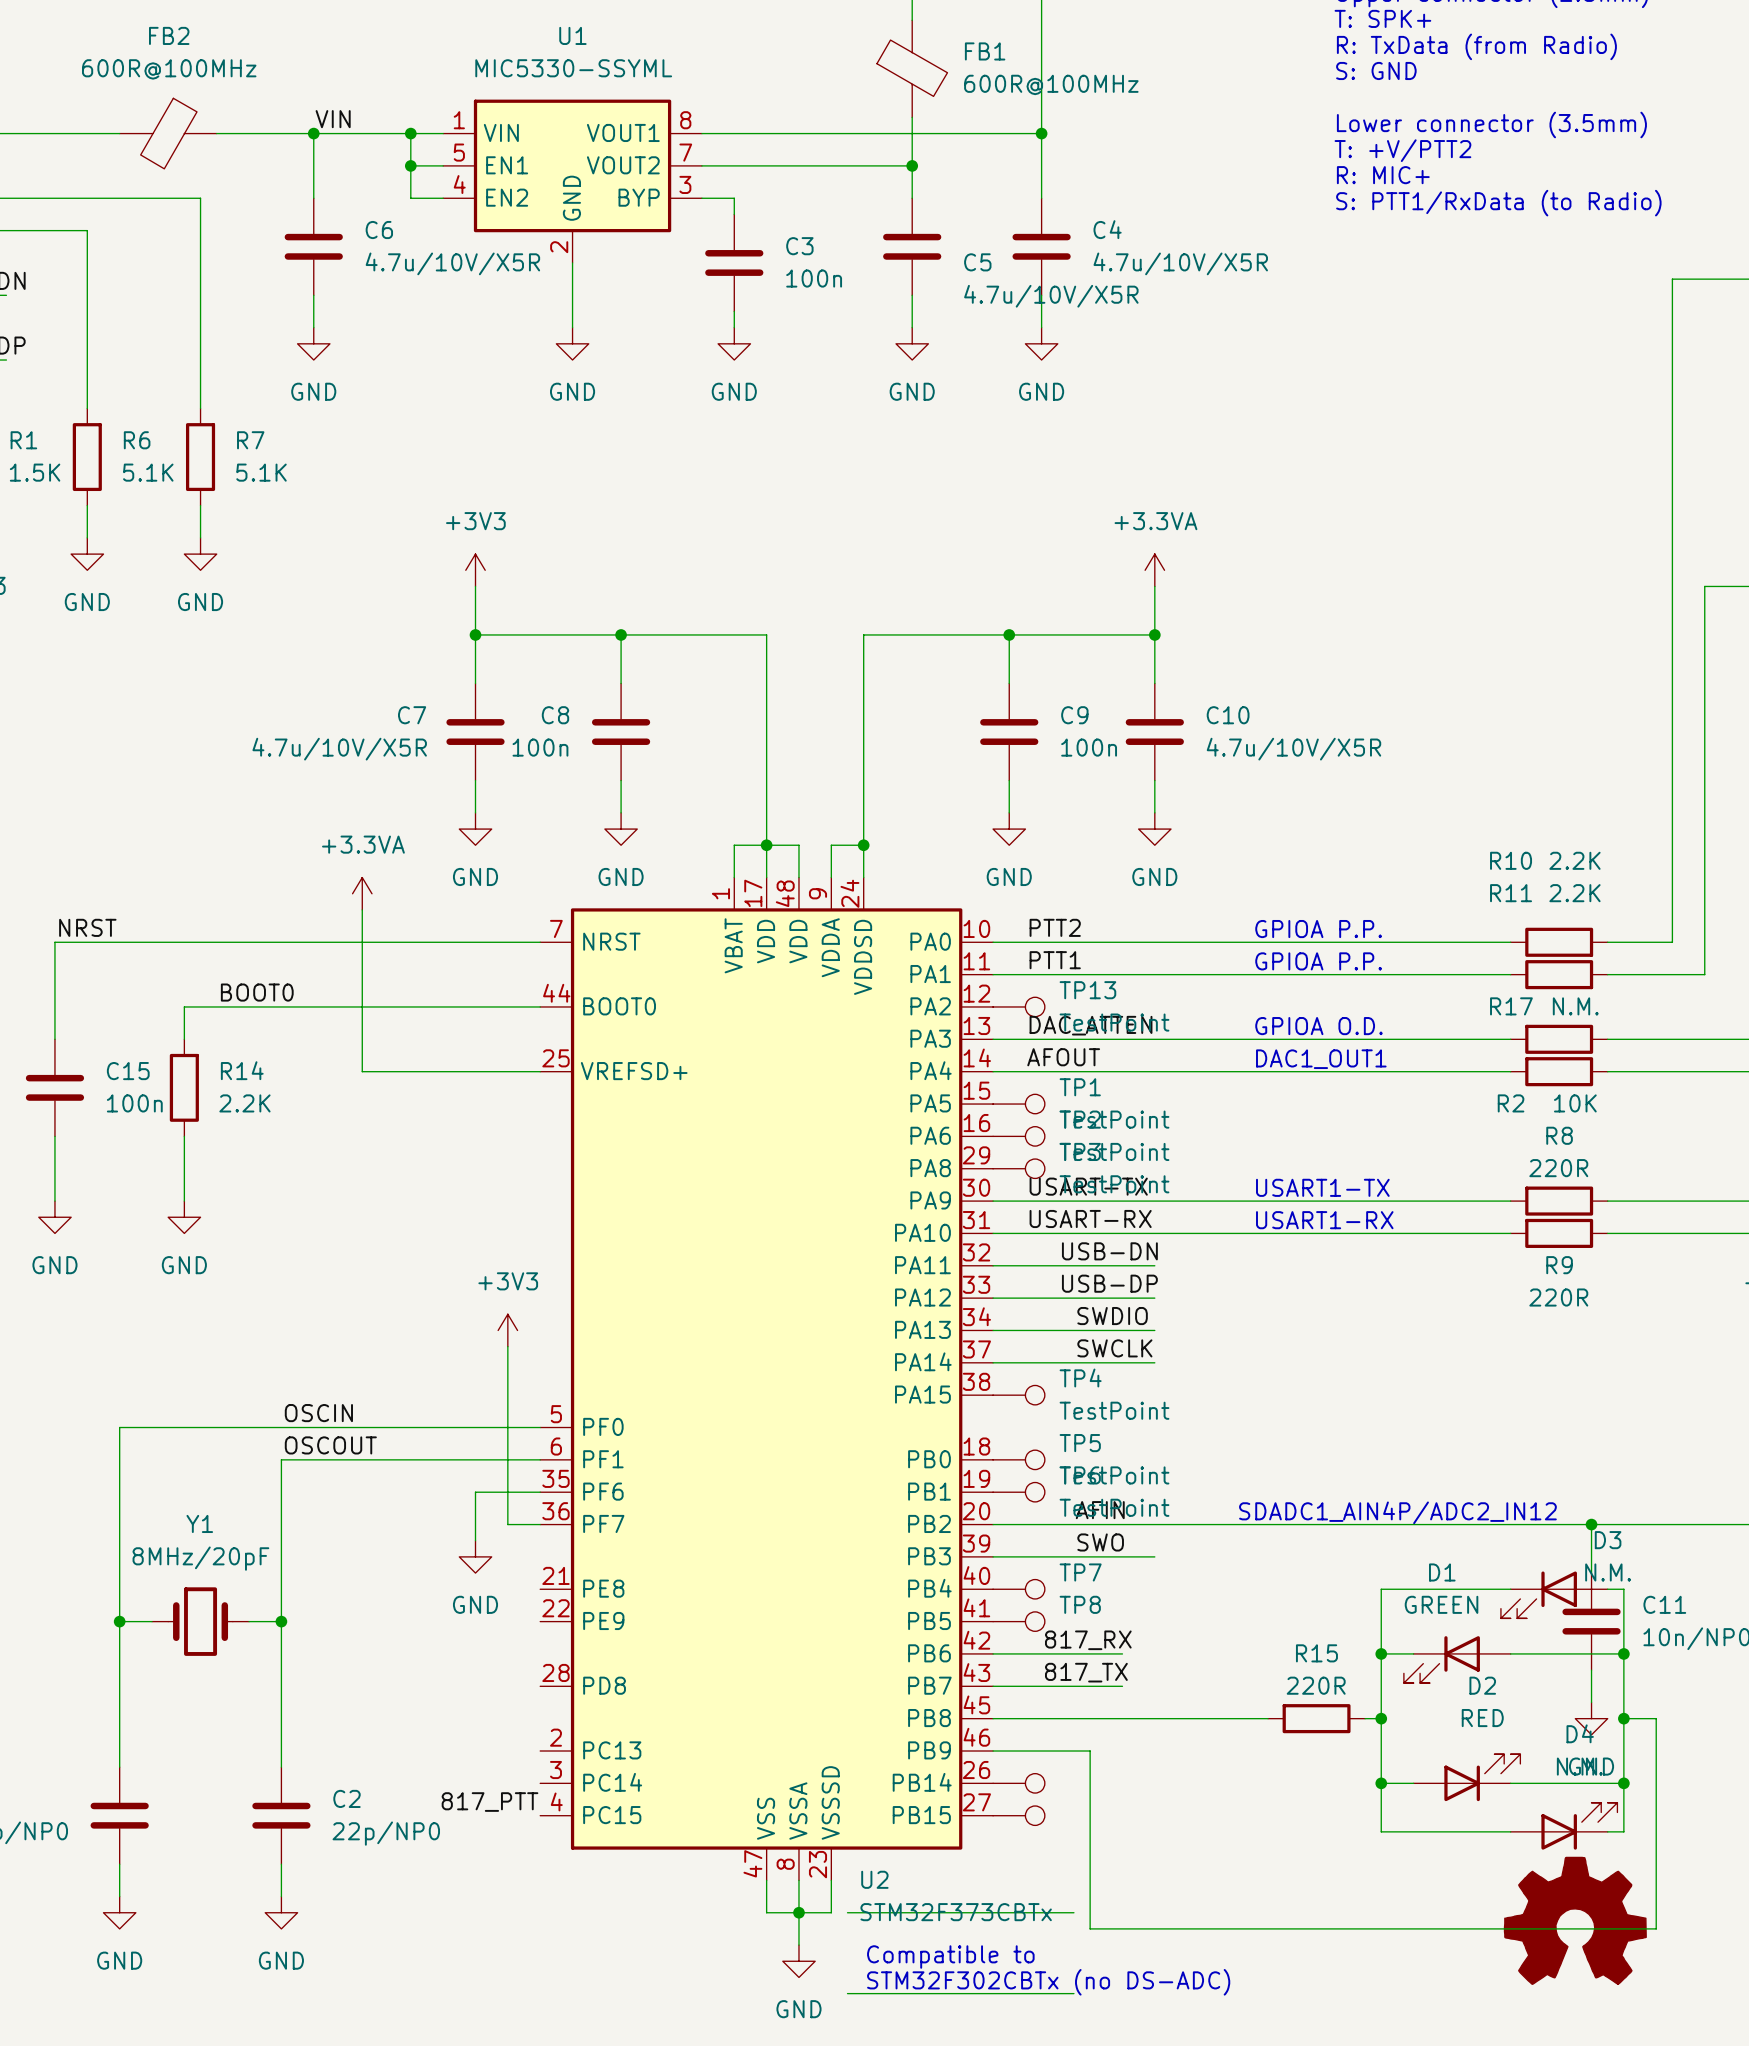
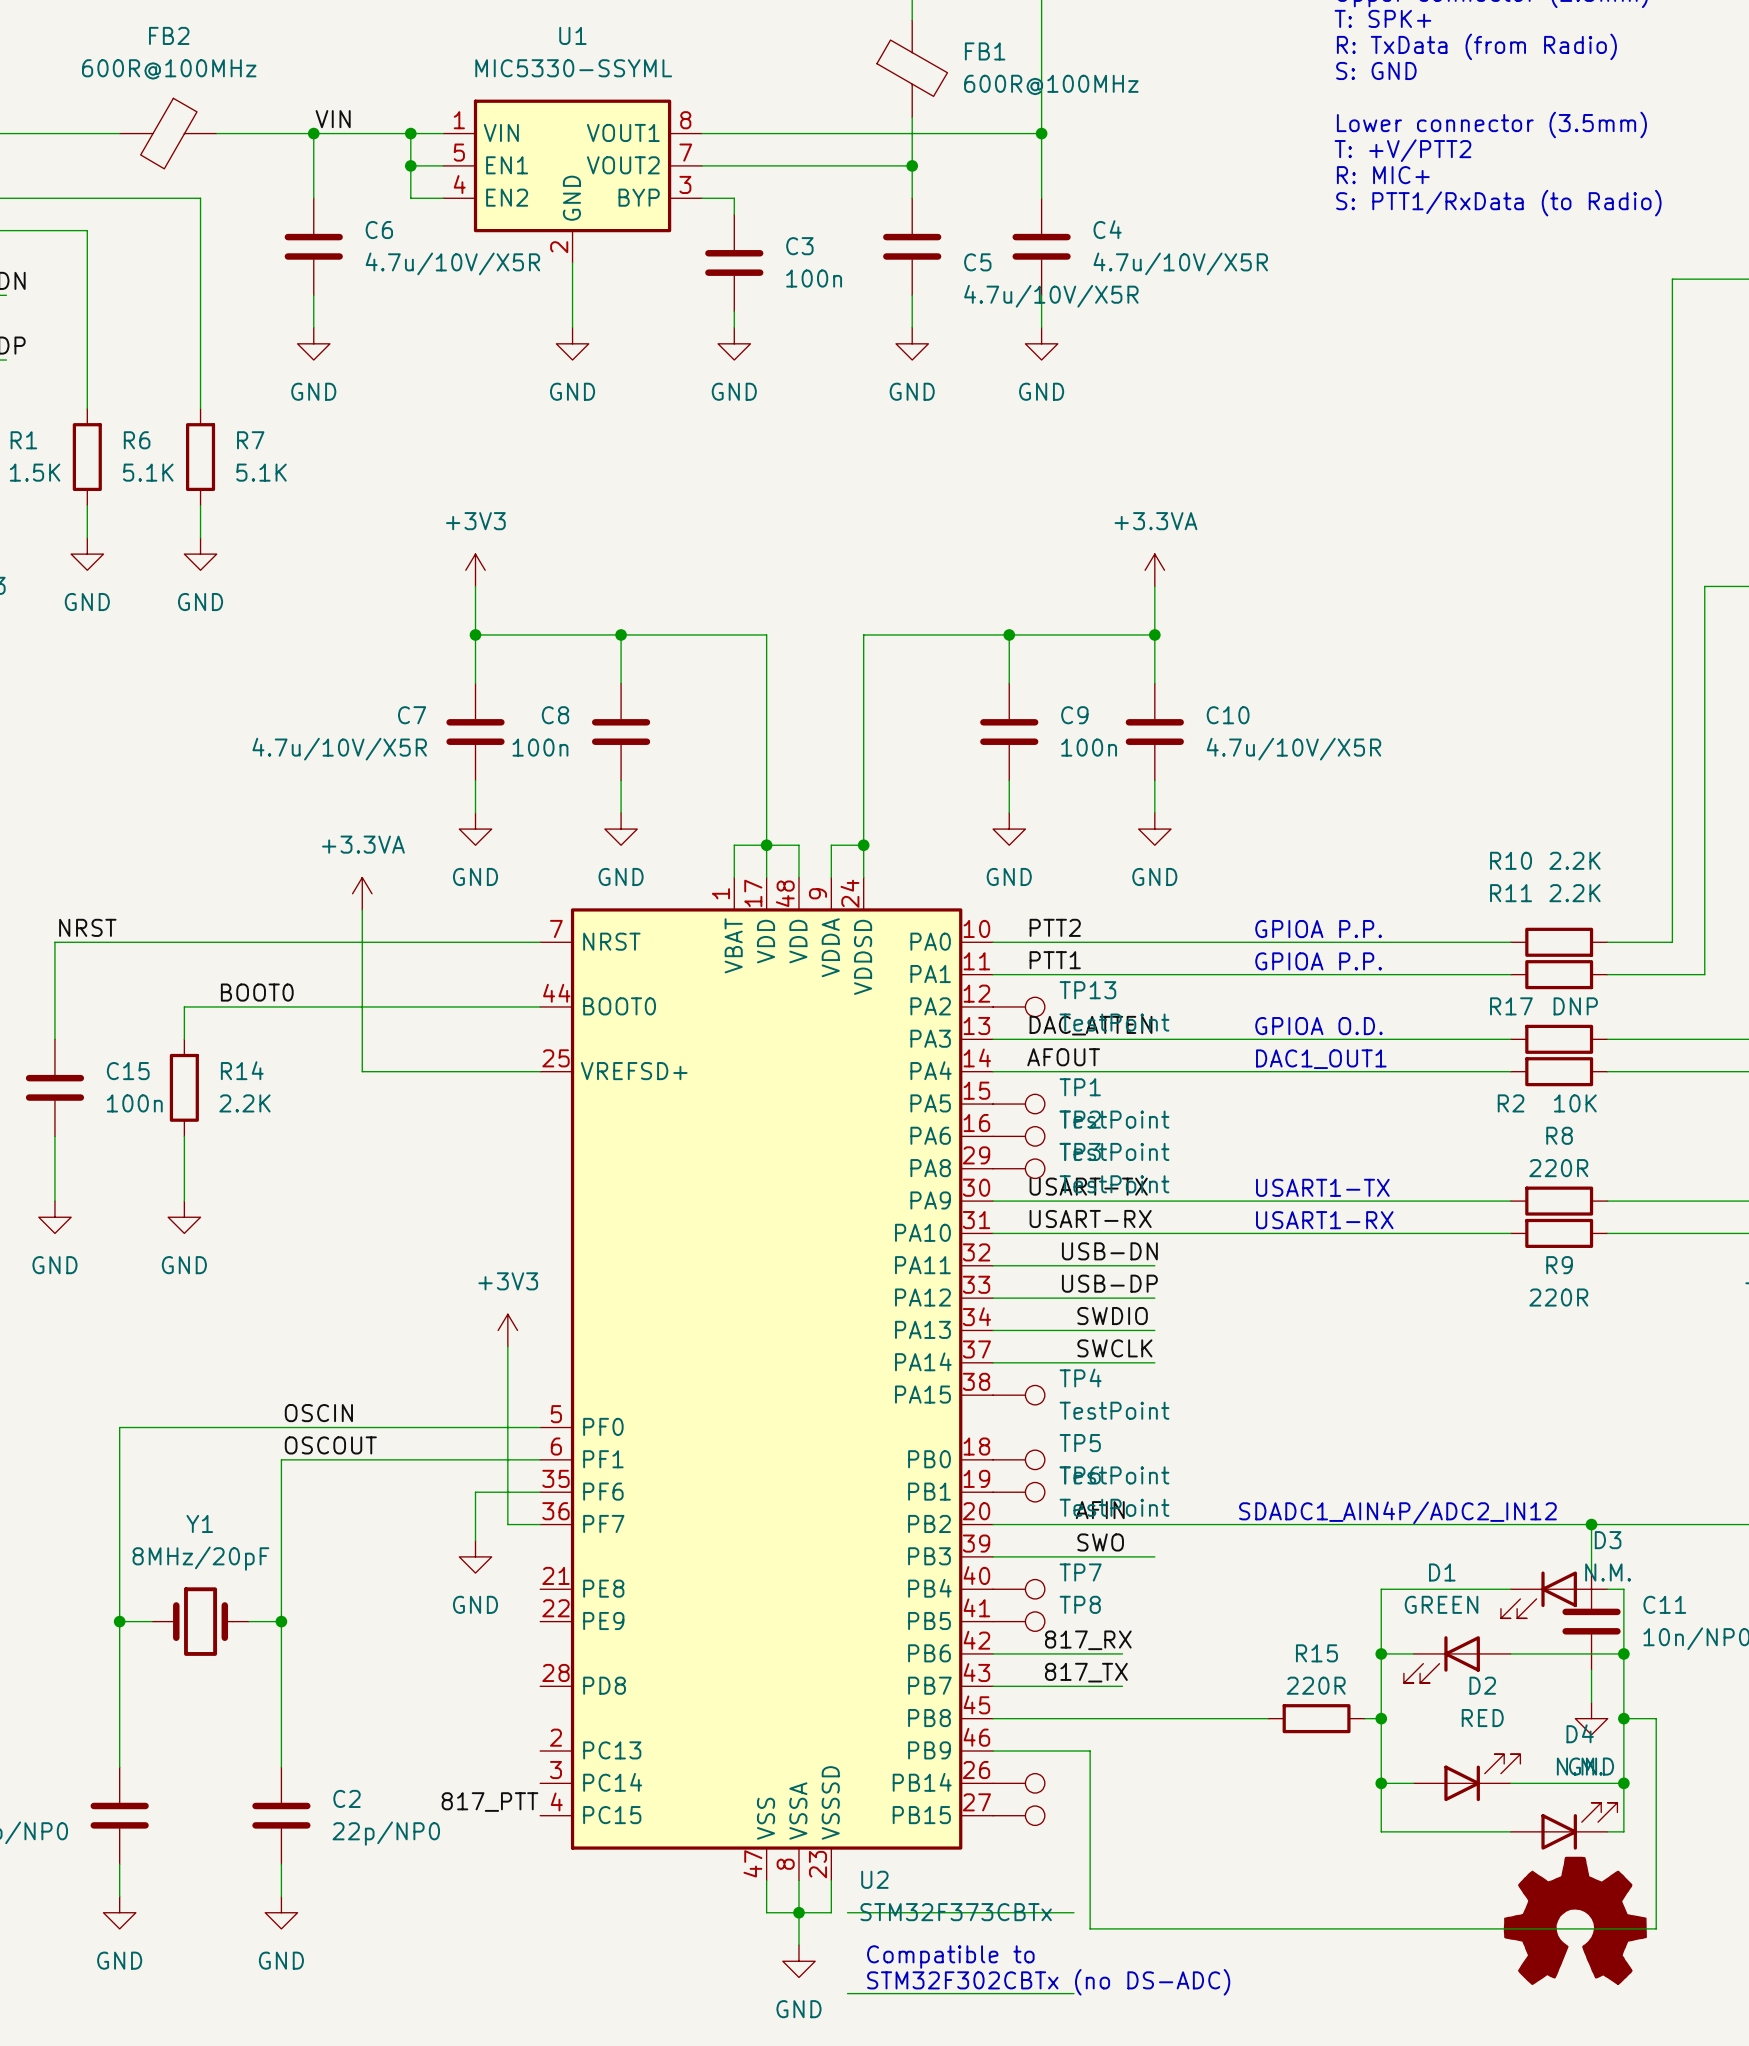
R17 value: N.M. (1575, 1006) -> DNP (1575, 1006)

